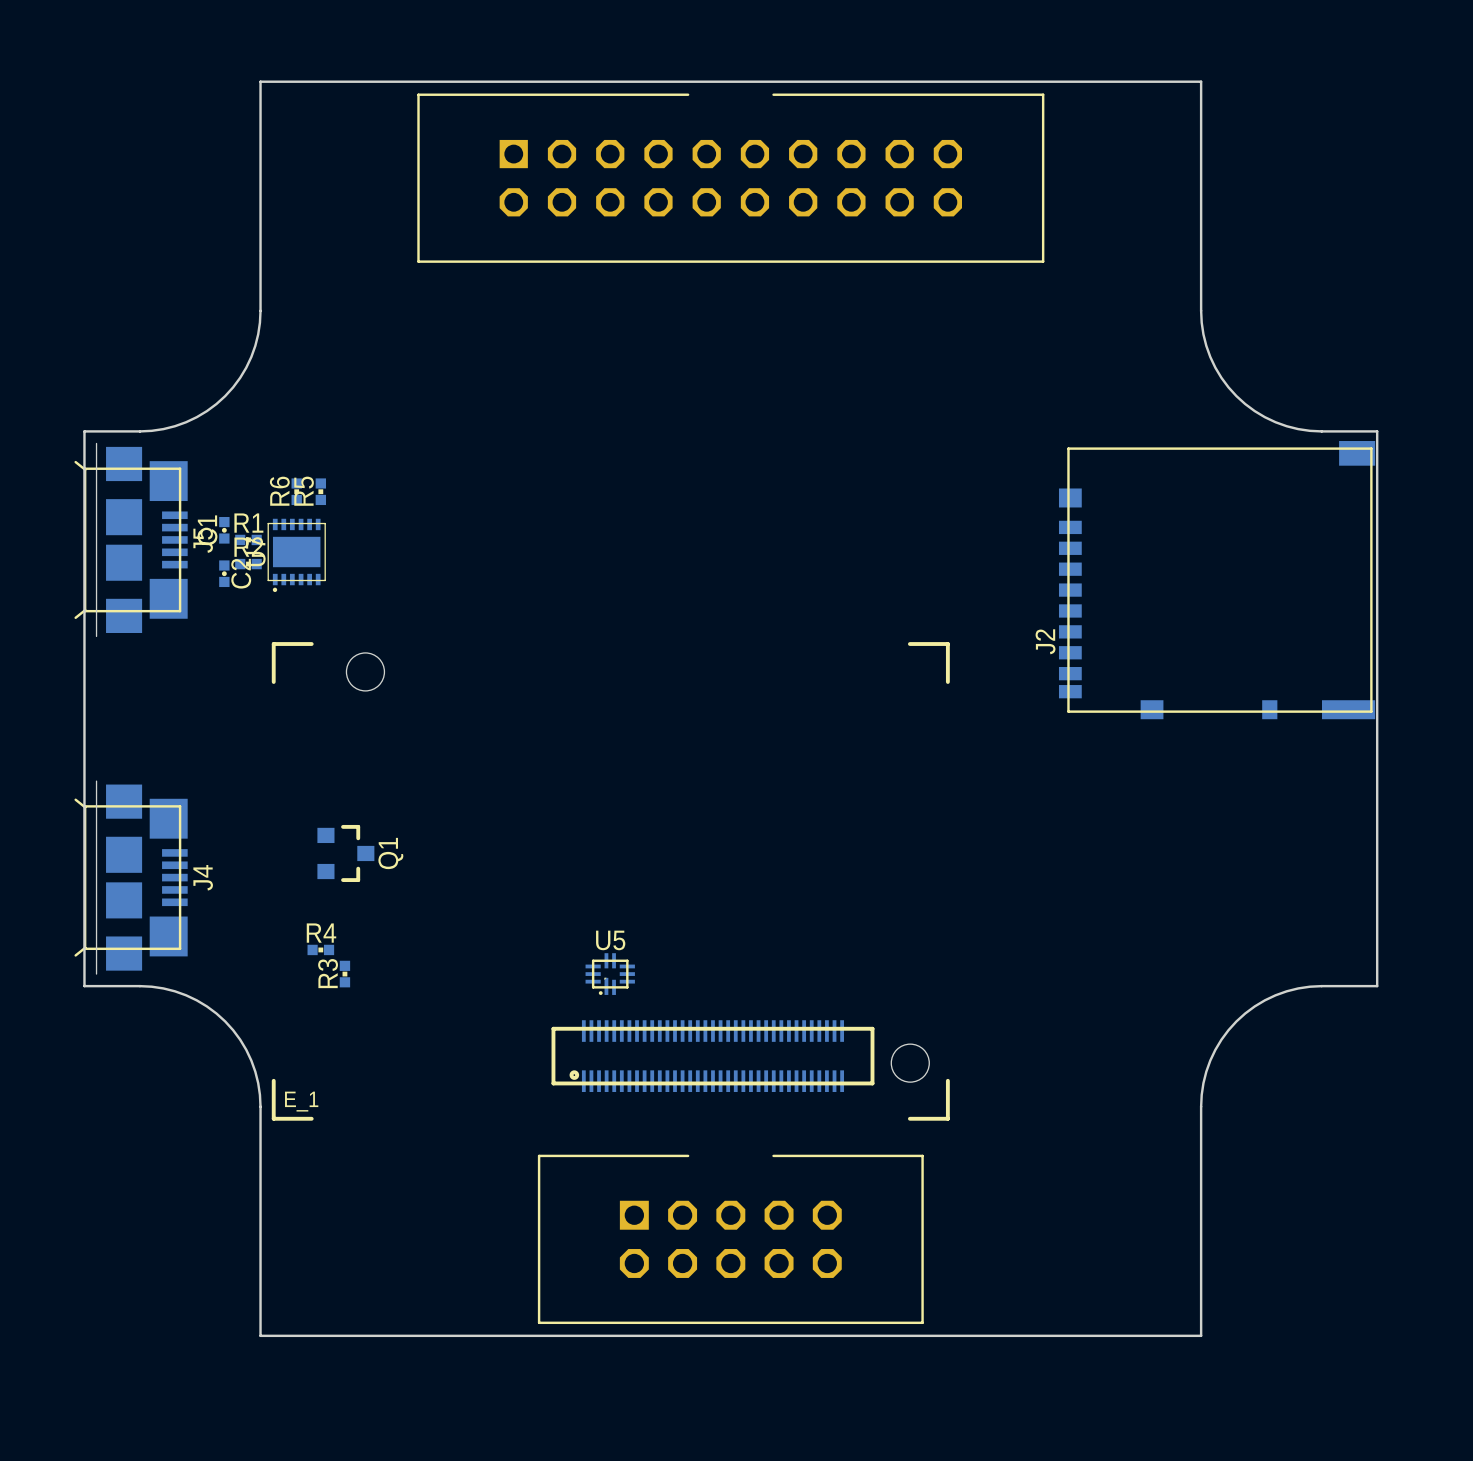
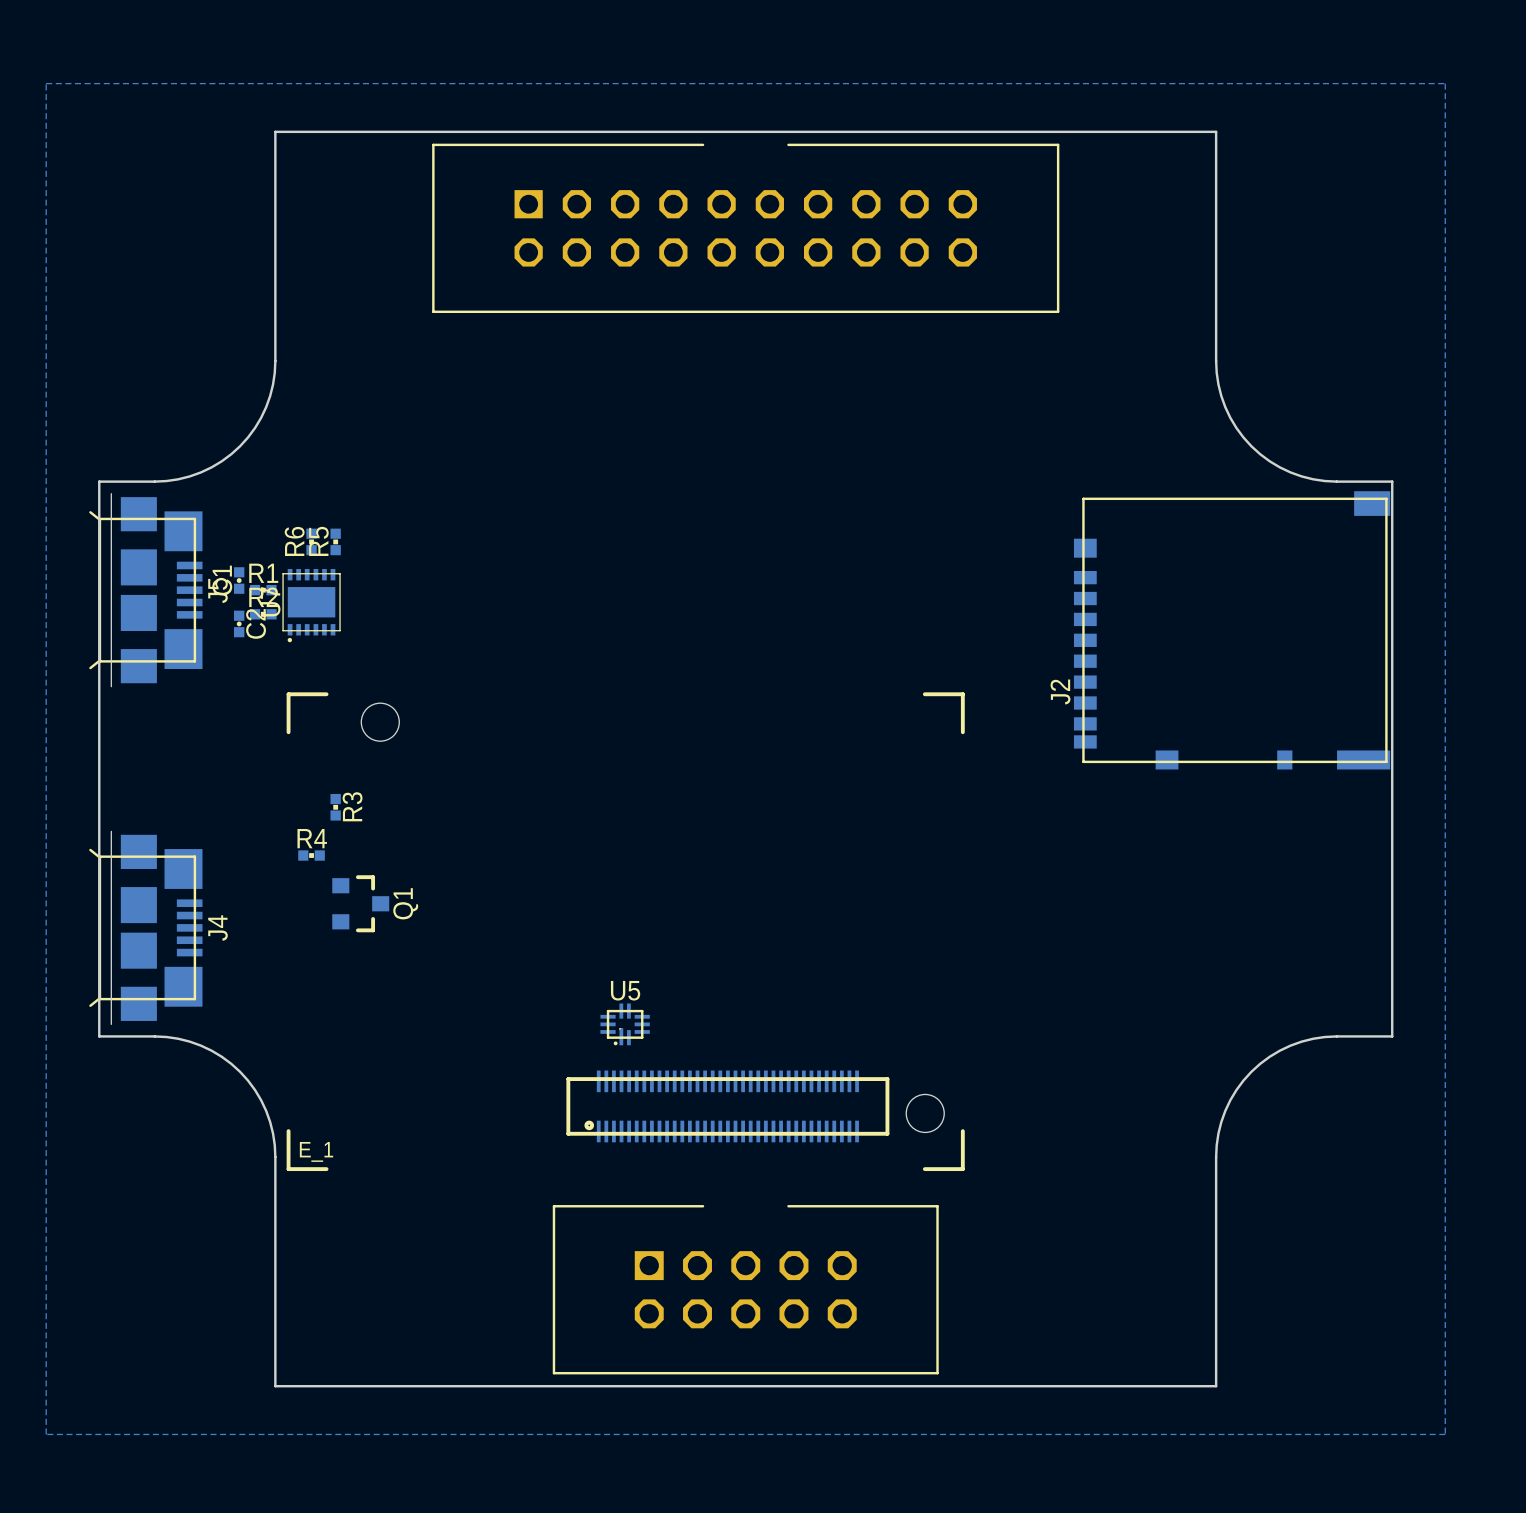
zone outline: none -> (1445, 83) (46, 83) (46, 1434) (1445, 1434) (1445, 83)
R4 position: (320, 949) -> (311, 855)
R3 name position: R3 (328, 973) -> R3 (352, 806)
R3 position: (344, 974) -> (335, 807)

